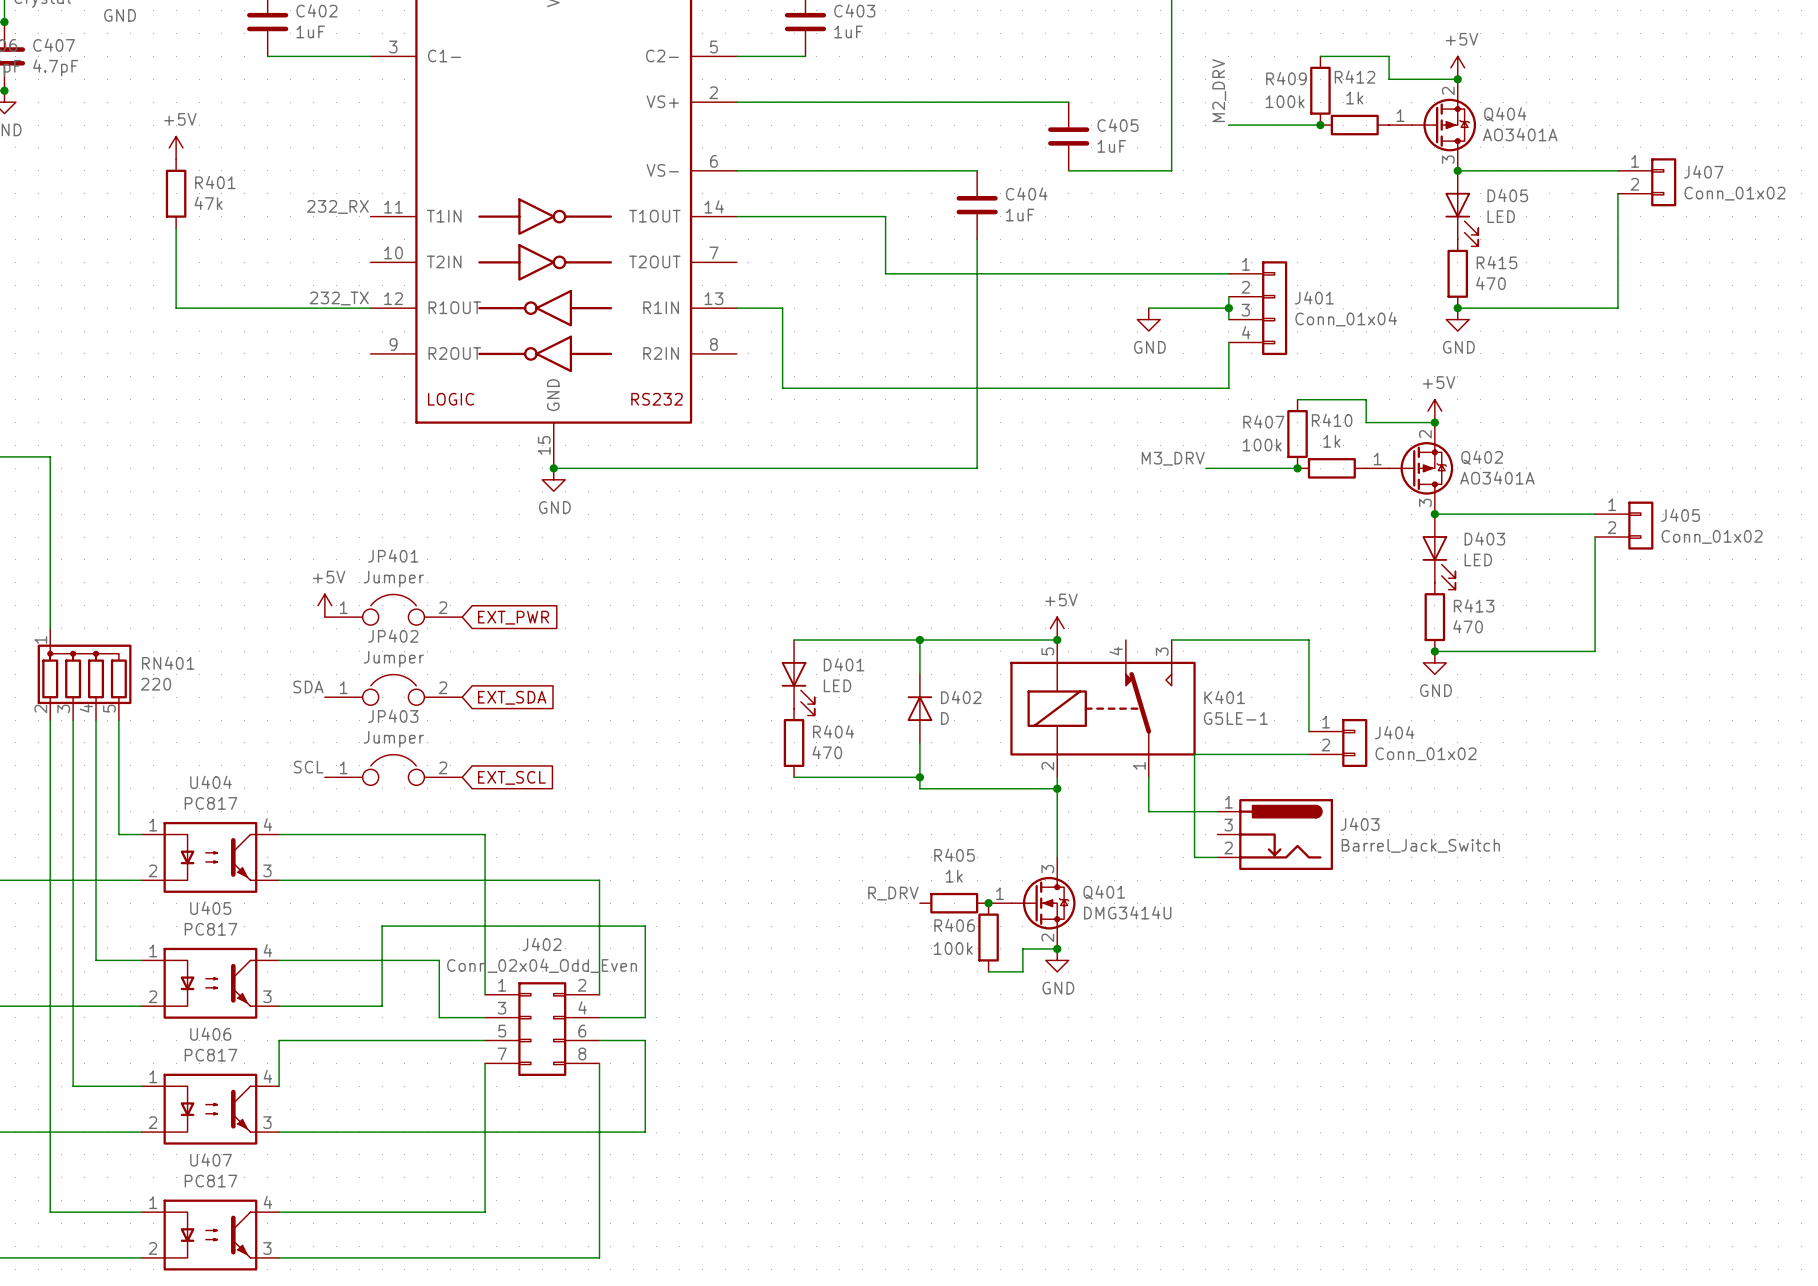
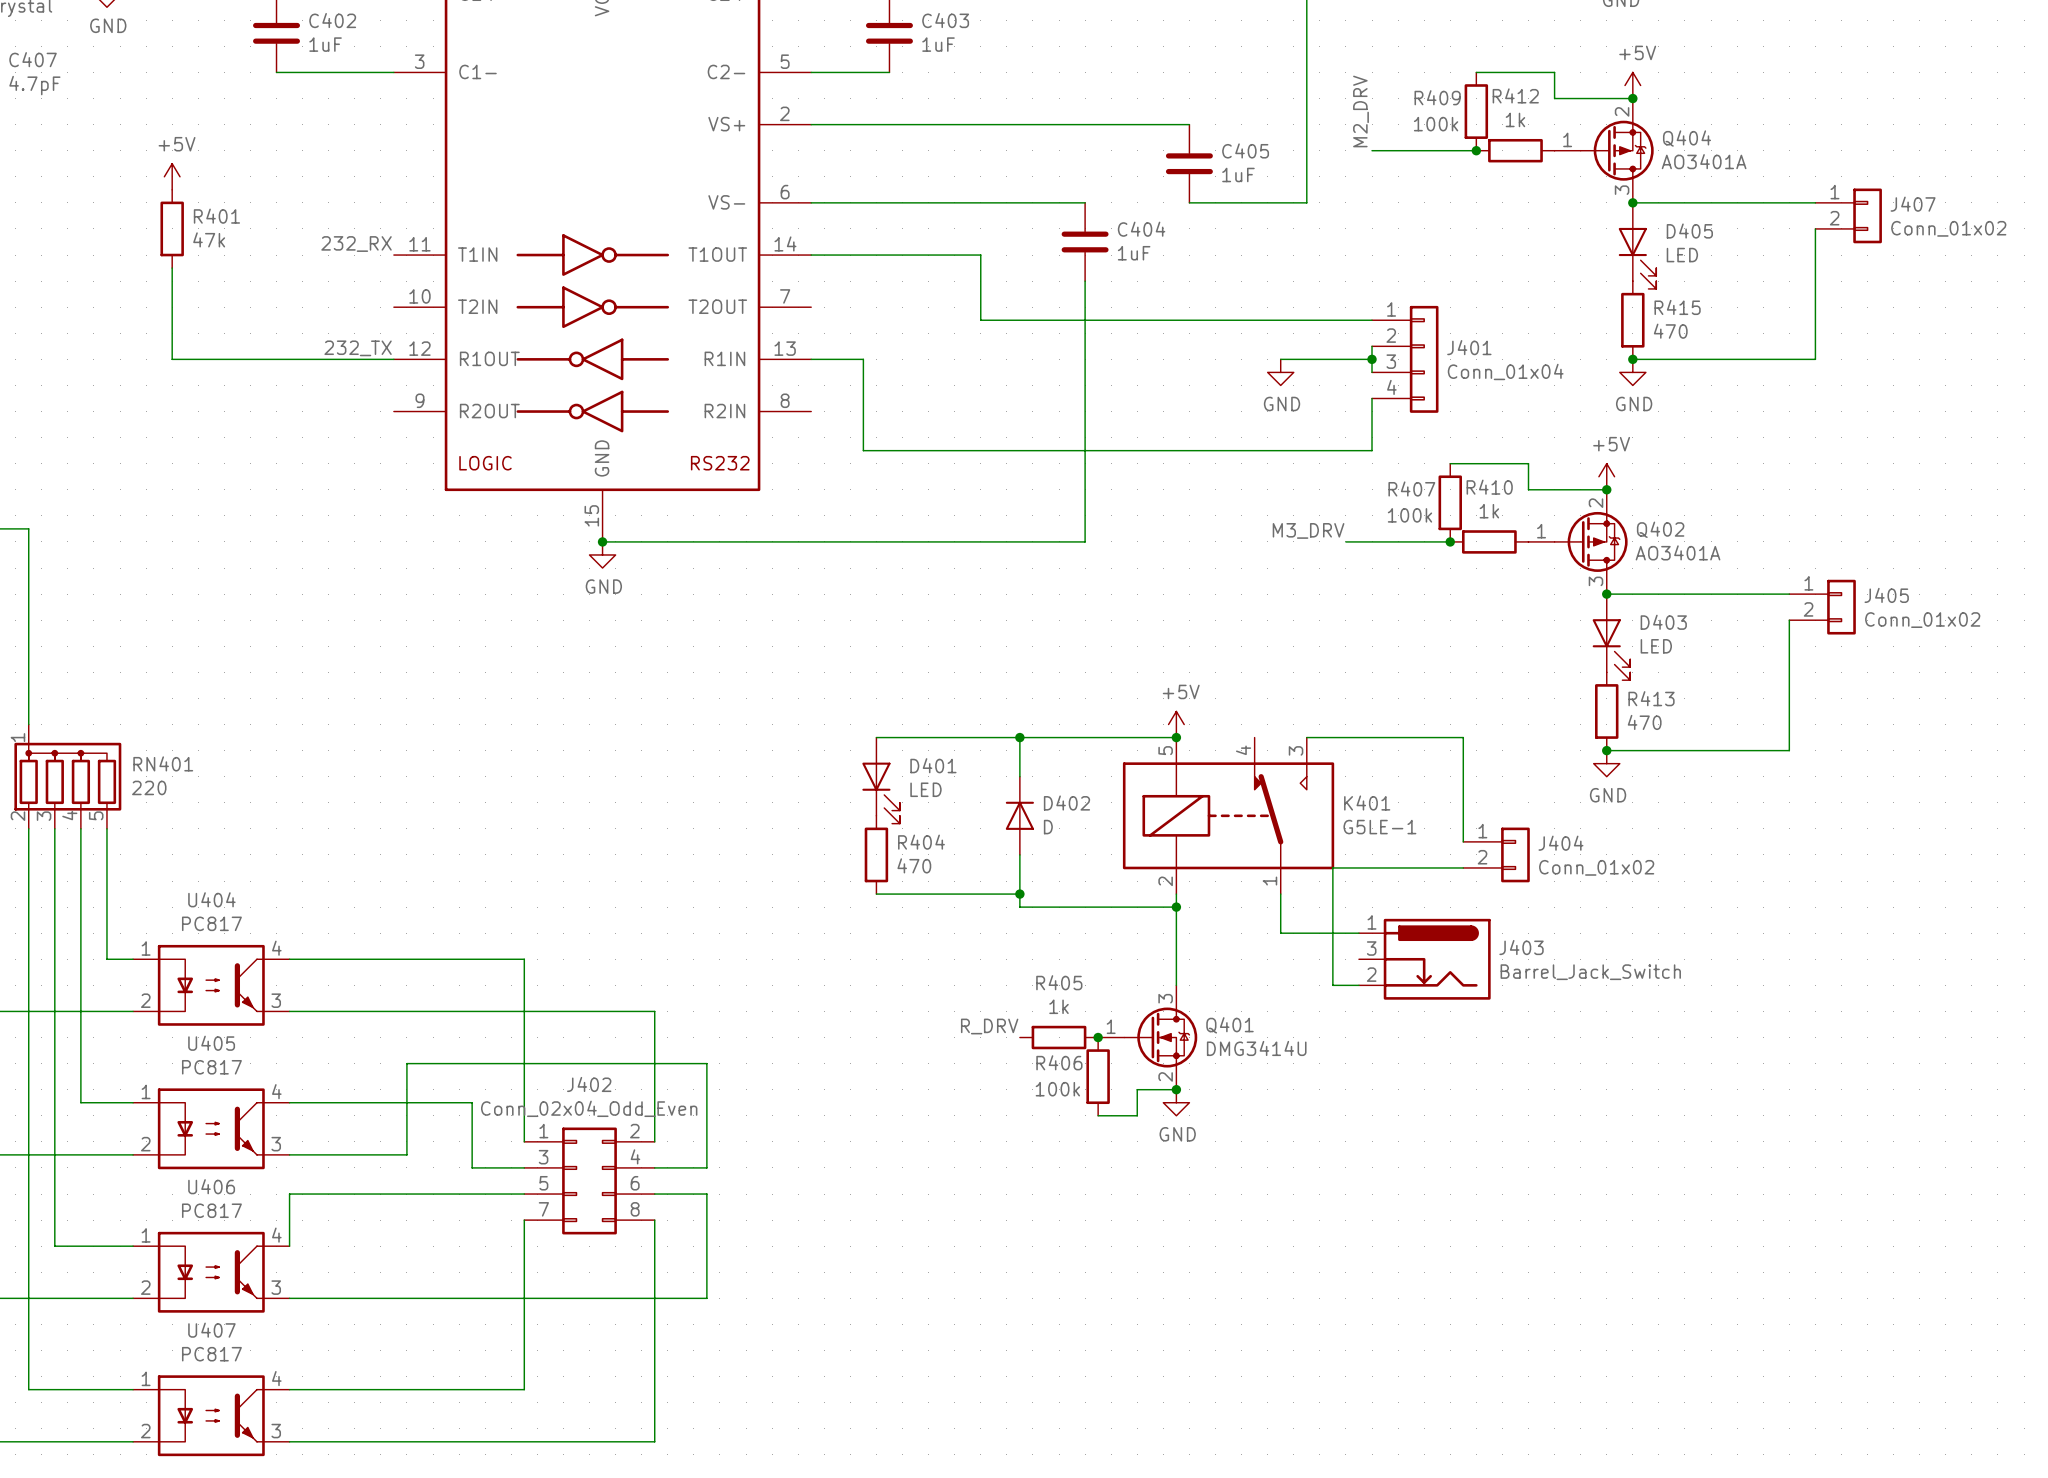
power symbol: +5V (324, 605) -> none
JP401: Jumper (393, 609) -> none
global label: EXT_PWR (513, 617) -> none
label: SDA (308, 687) -> none
JP402: Jumper (393, 689) -> none
global label: EXT_SDA (512, 697) -> none
label: SCL (308, 767) -> none
JP403: Jumper (393, 769) -> none
global label: EXT_SCL (511, 777) -> none

